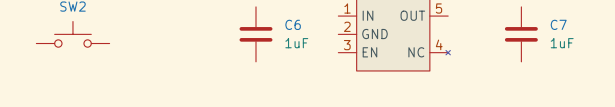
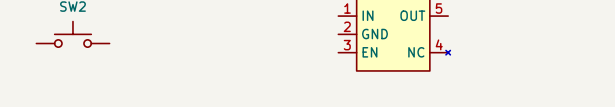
C6: 1uF (255, 34) -> none
C7: 1uF (521, 34) -> none

